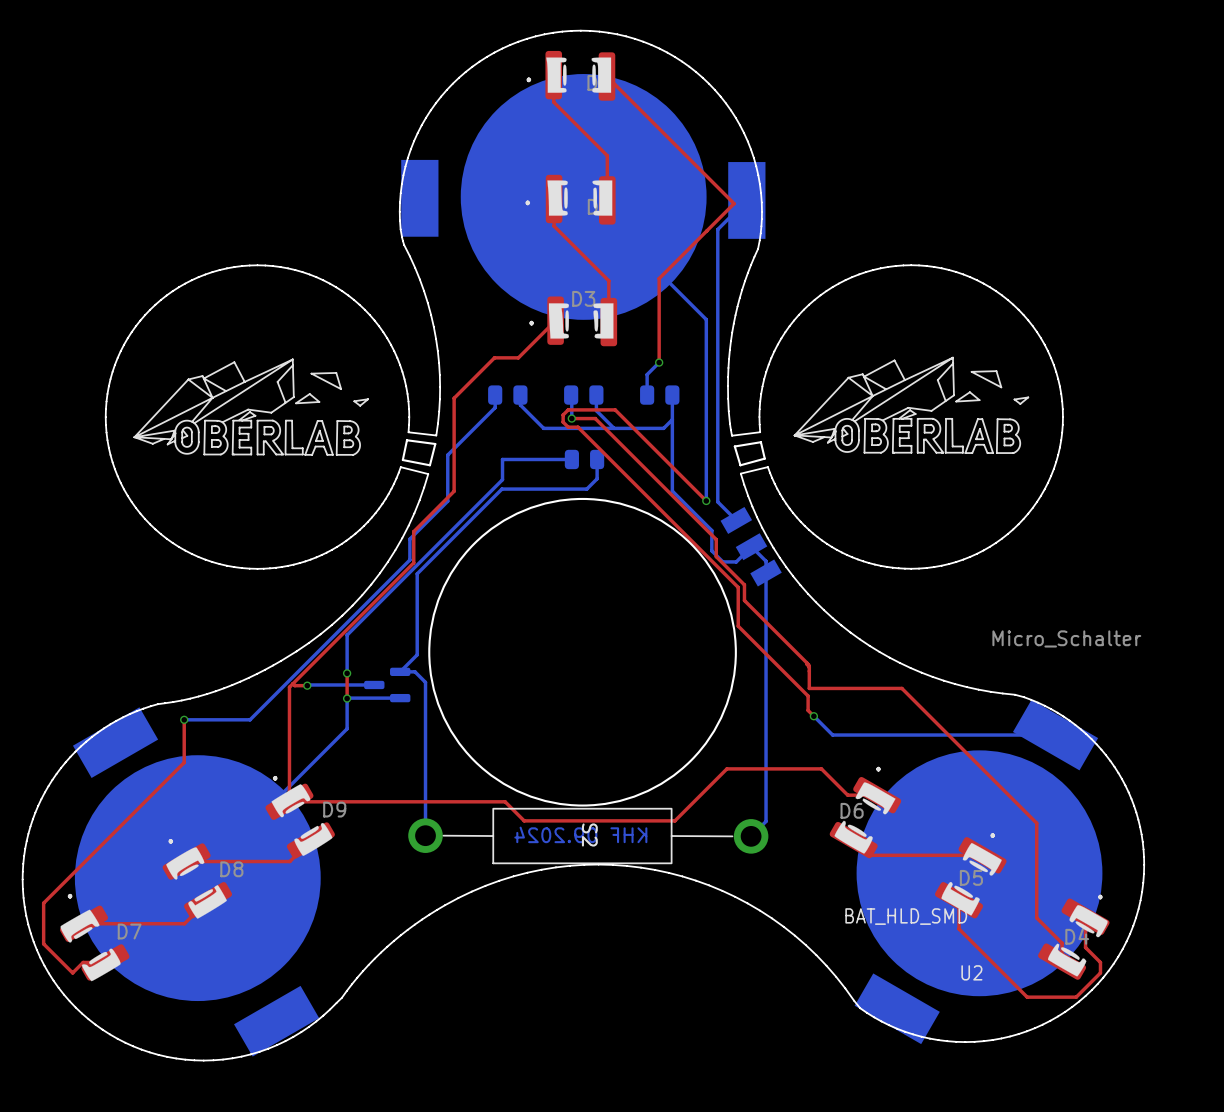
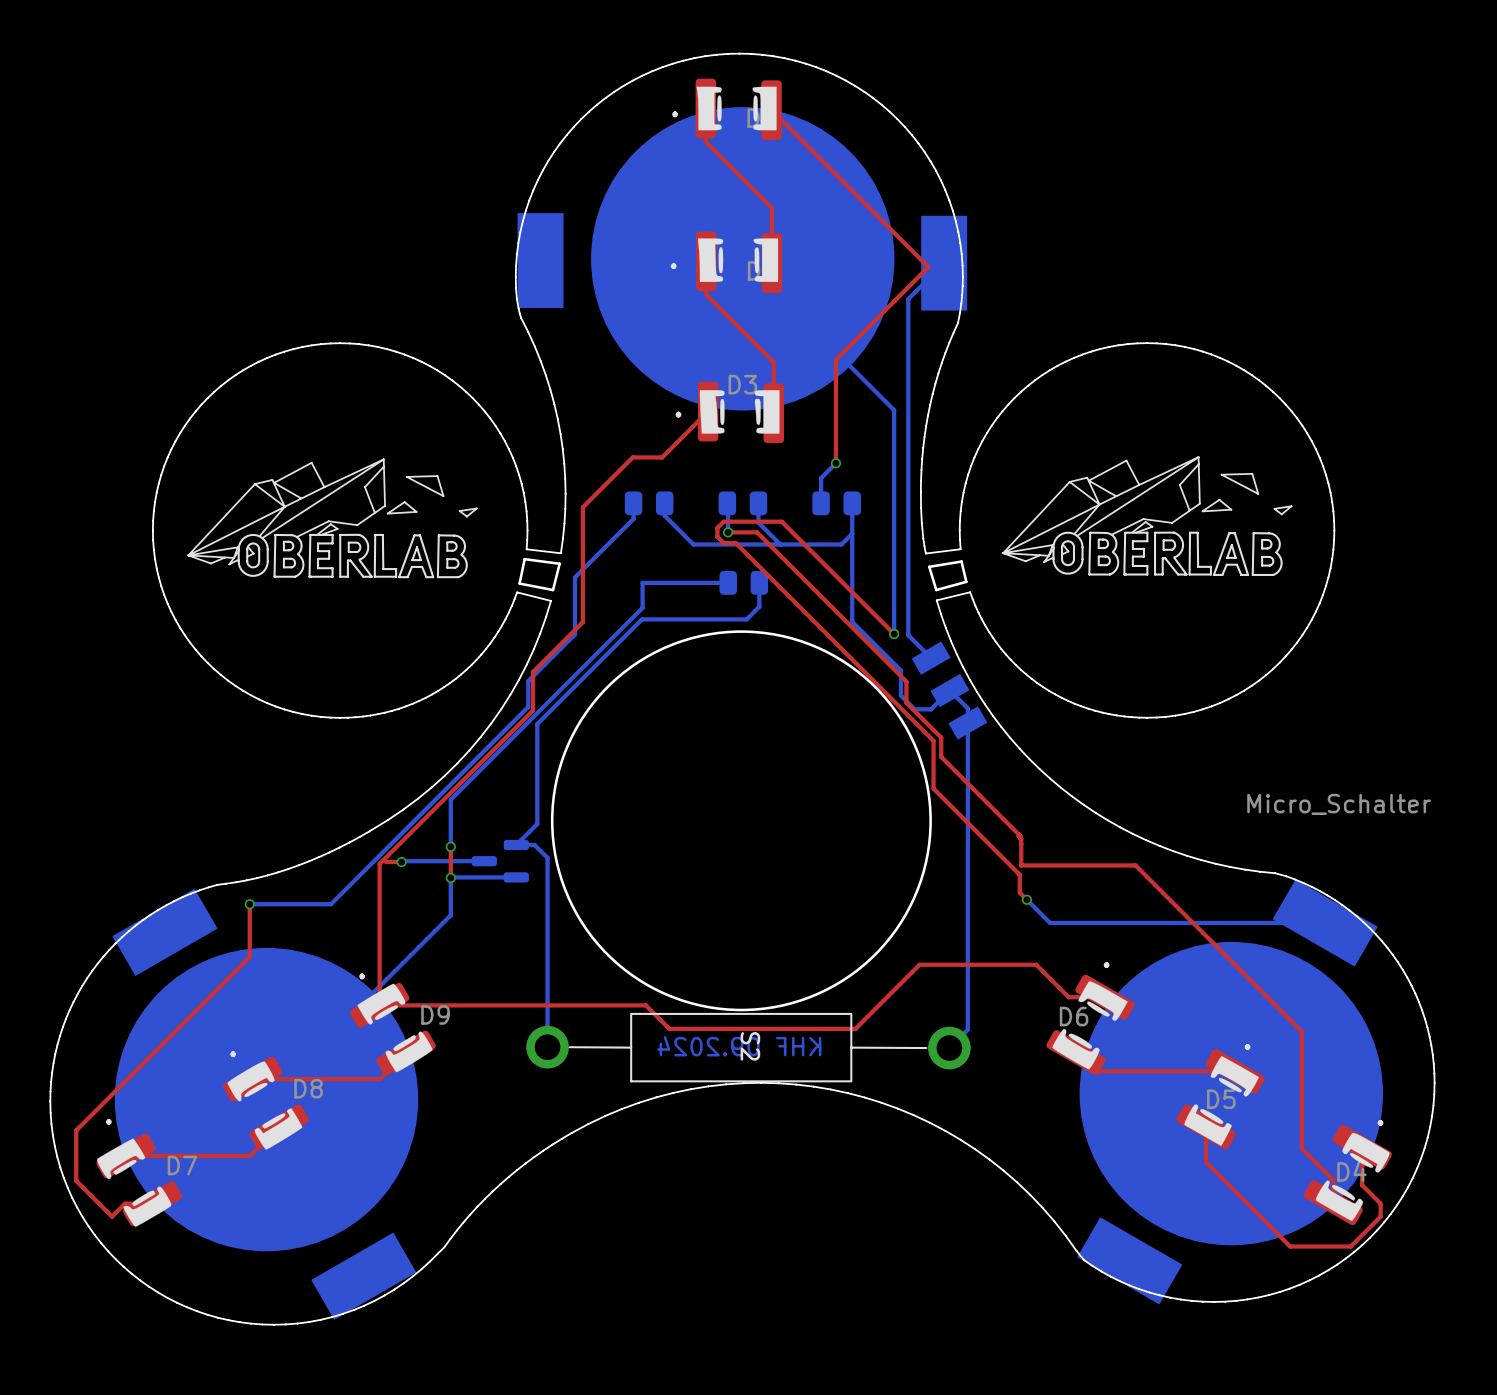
U2 value: BAT_HLD_SMD (906, 916) -> none
U2 name: U2 (971, 972) -> none

